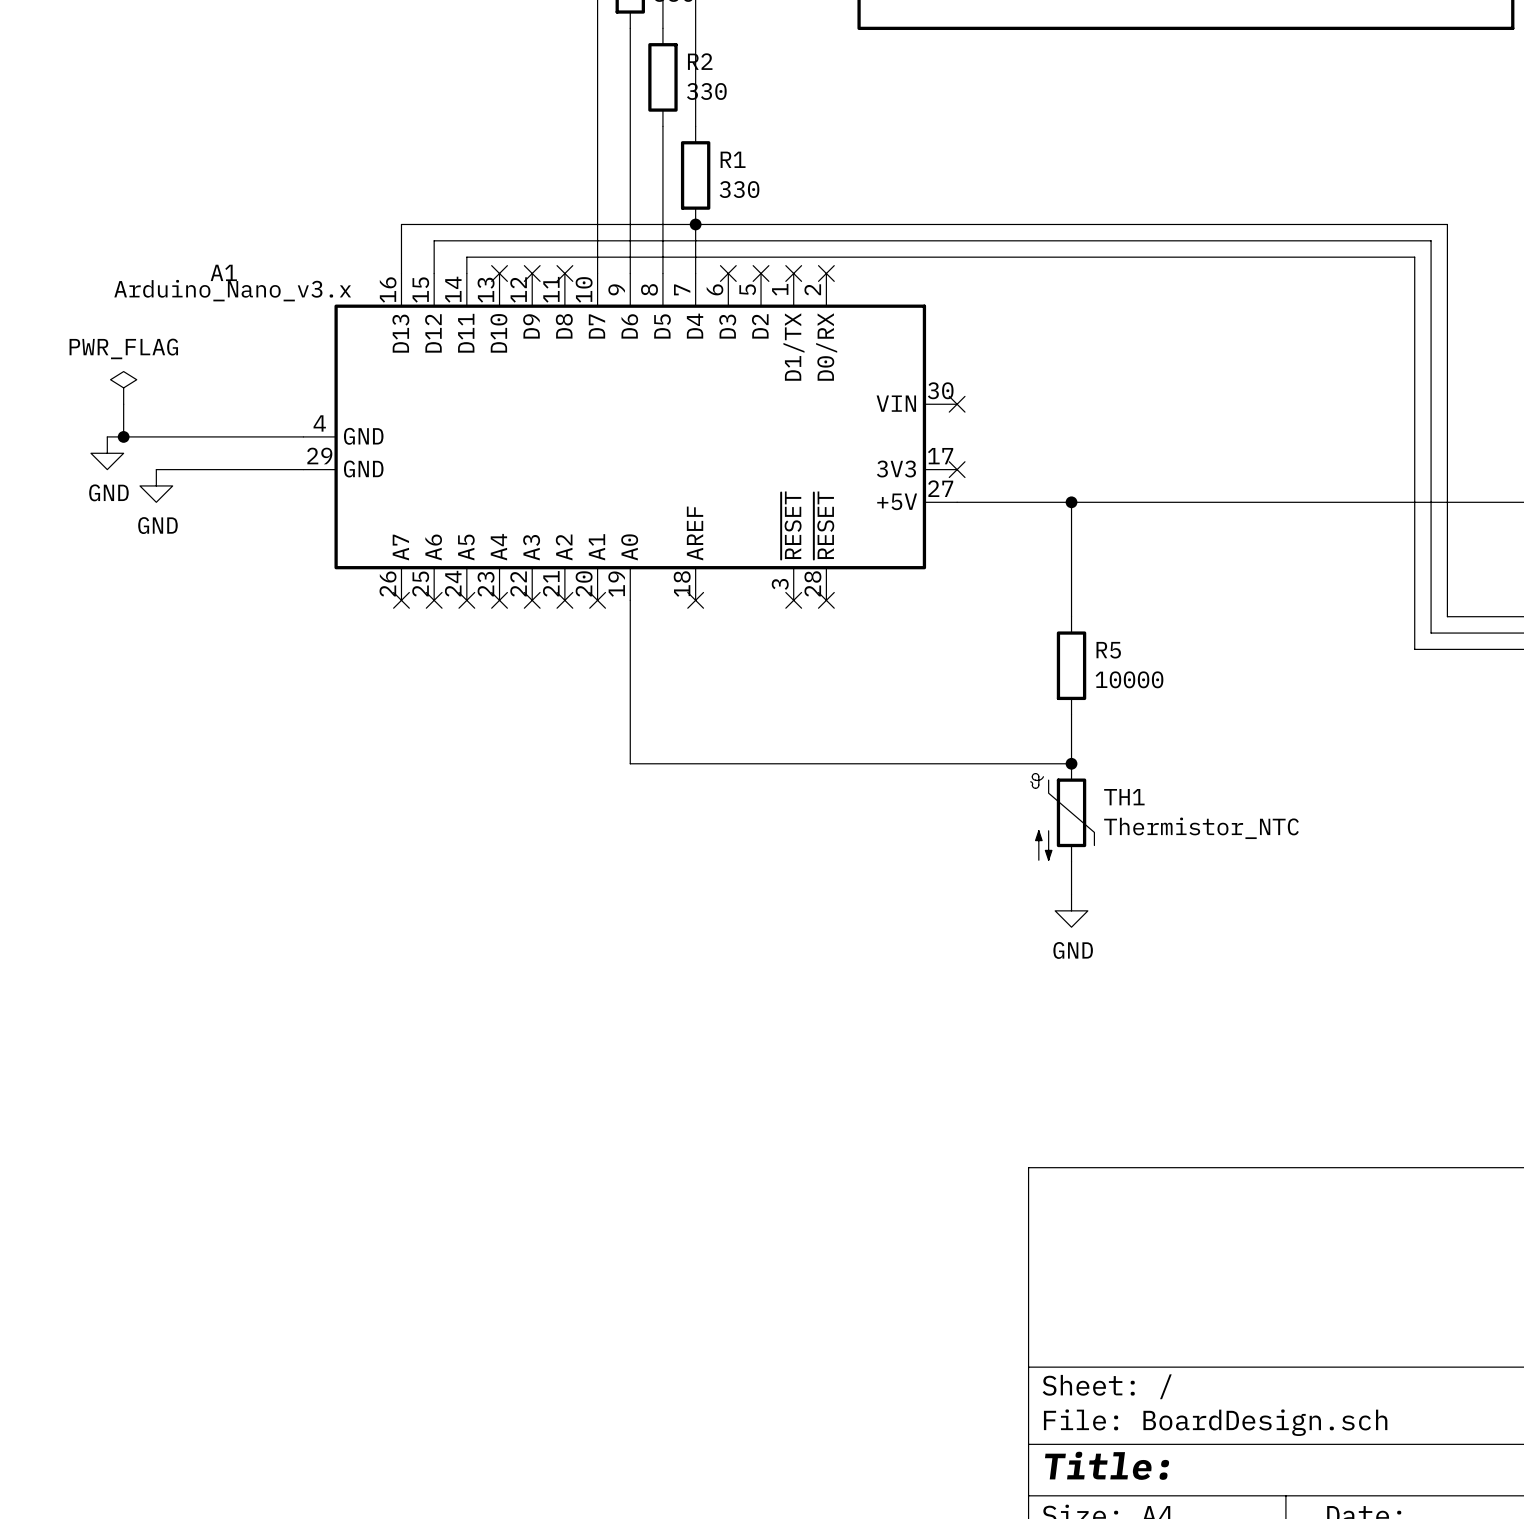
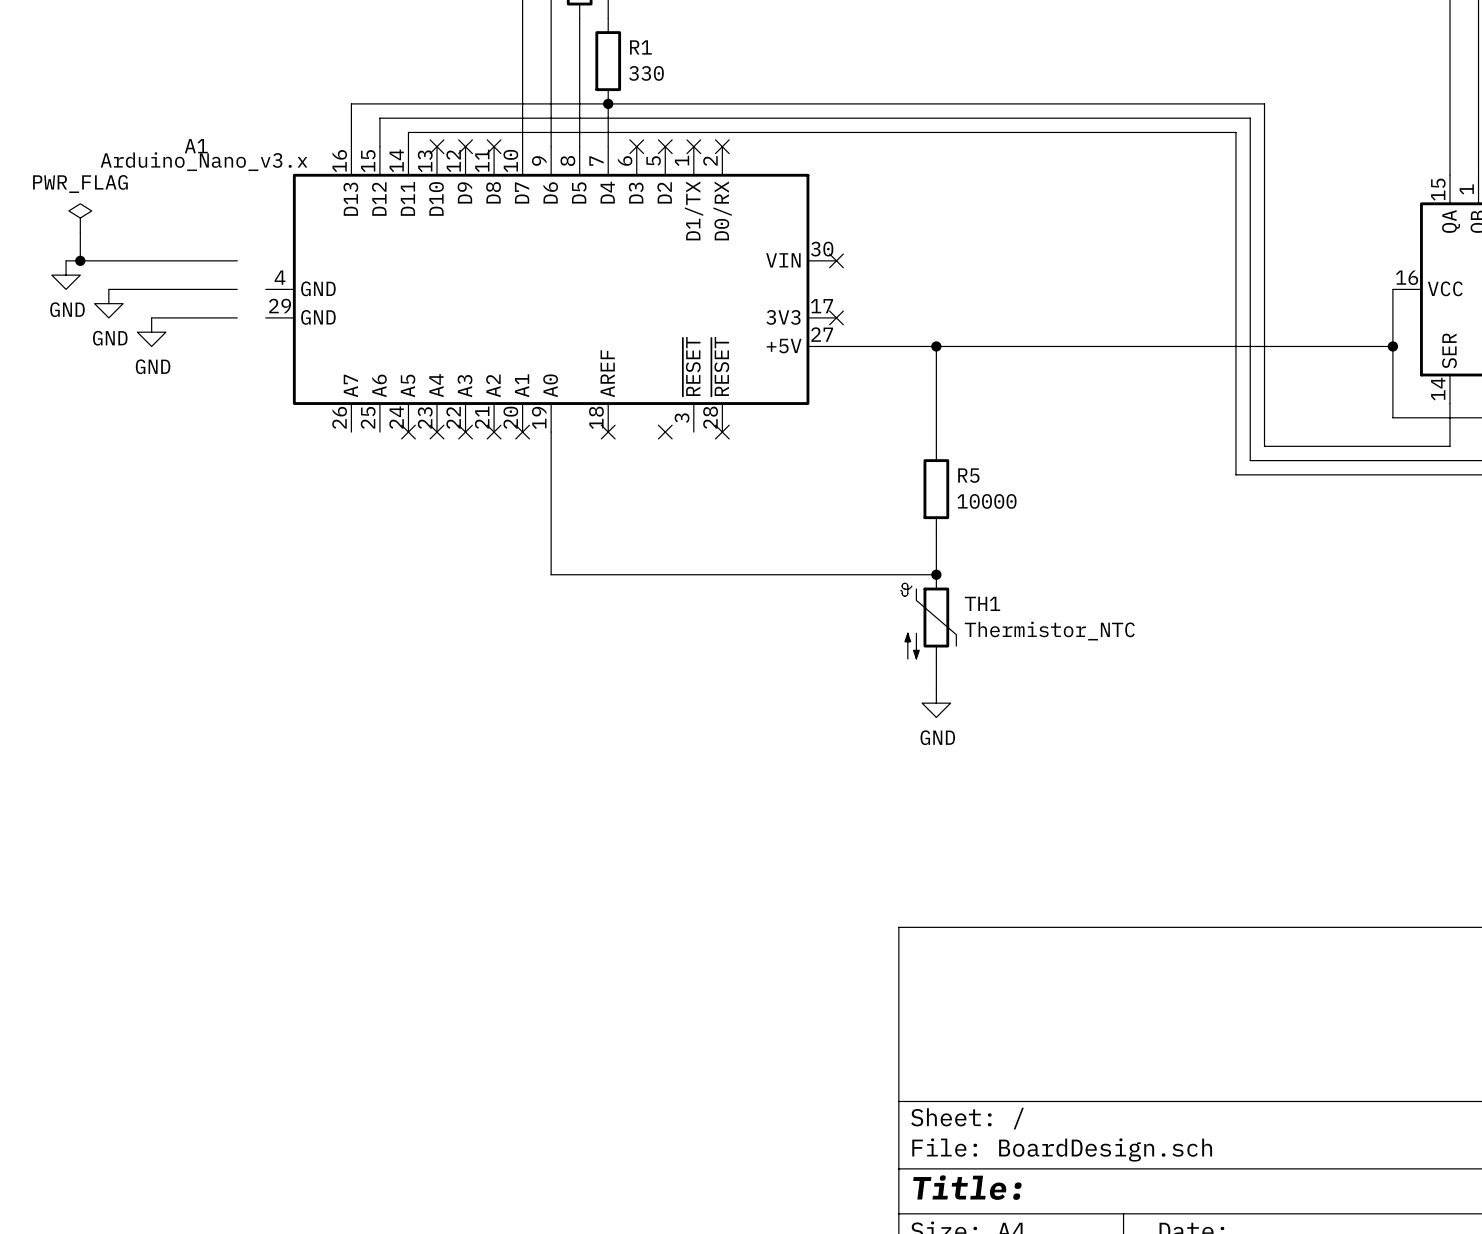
wire: none -> (80, 232) (80, 260)
power symbol position: PWR_FLAG (123, 387) -> PWR_FLAG (80, 218)
wire: none -> (66, 260) (237, 260)
wire: (123, 404) (123, 436) (107, 436) -> none
power symbol: none -> GND (66, 275)
junction position: (123, 436) -> (80, 260)
wire: (270, 436) (303, 436) -> none
power symbol position: GND (107, 453) -> GND (108, 303)
wire: (156, 469) (172, 469) -> none
wire: (270, 469) (303, 469) -> none
power symbol position: GND (156, 485) -> GND (151, 332)
no-connect mark: (401, 600) -> none
no-connect mark: (434, 600) -> none
no-connect mark position: (793, 600) -> (665, 432)

